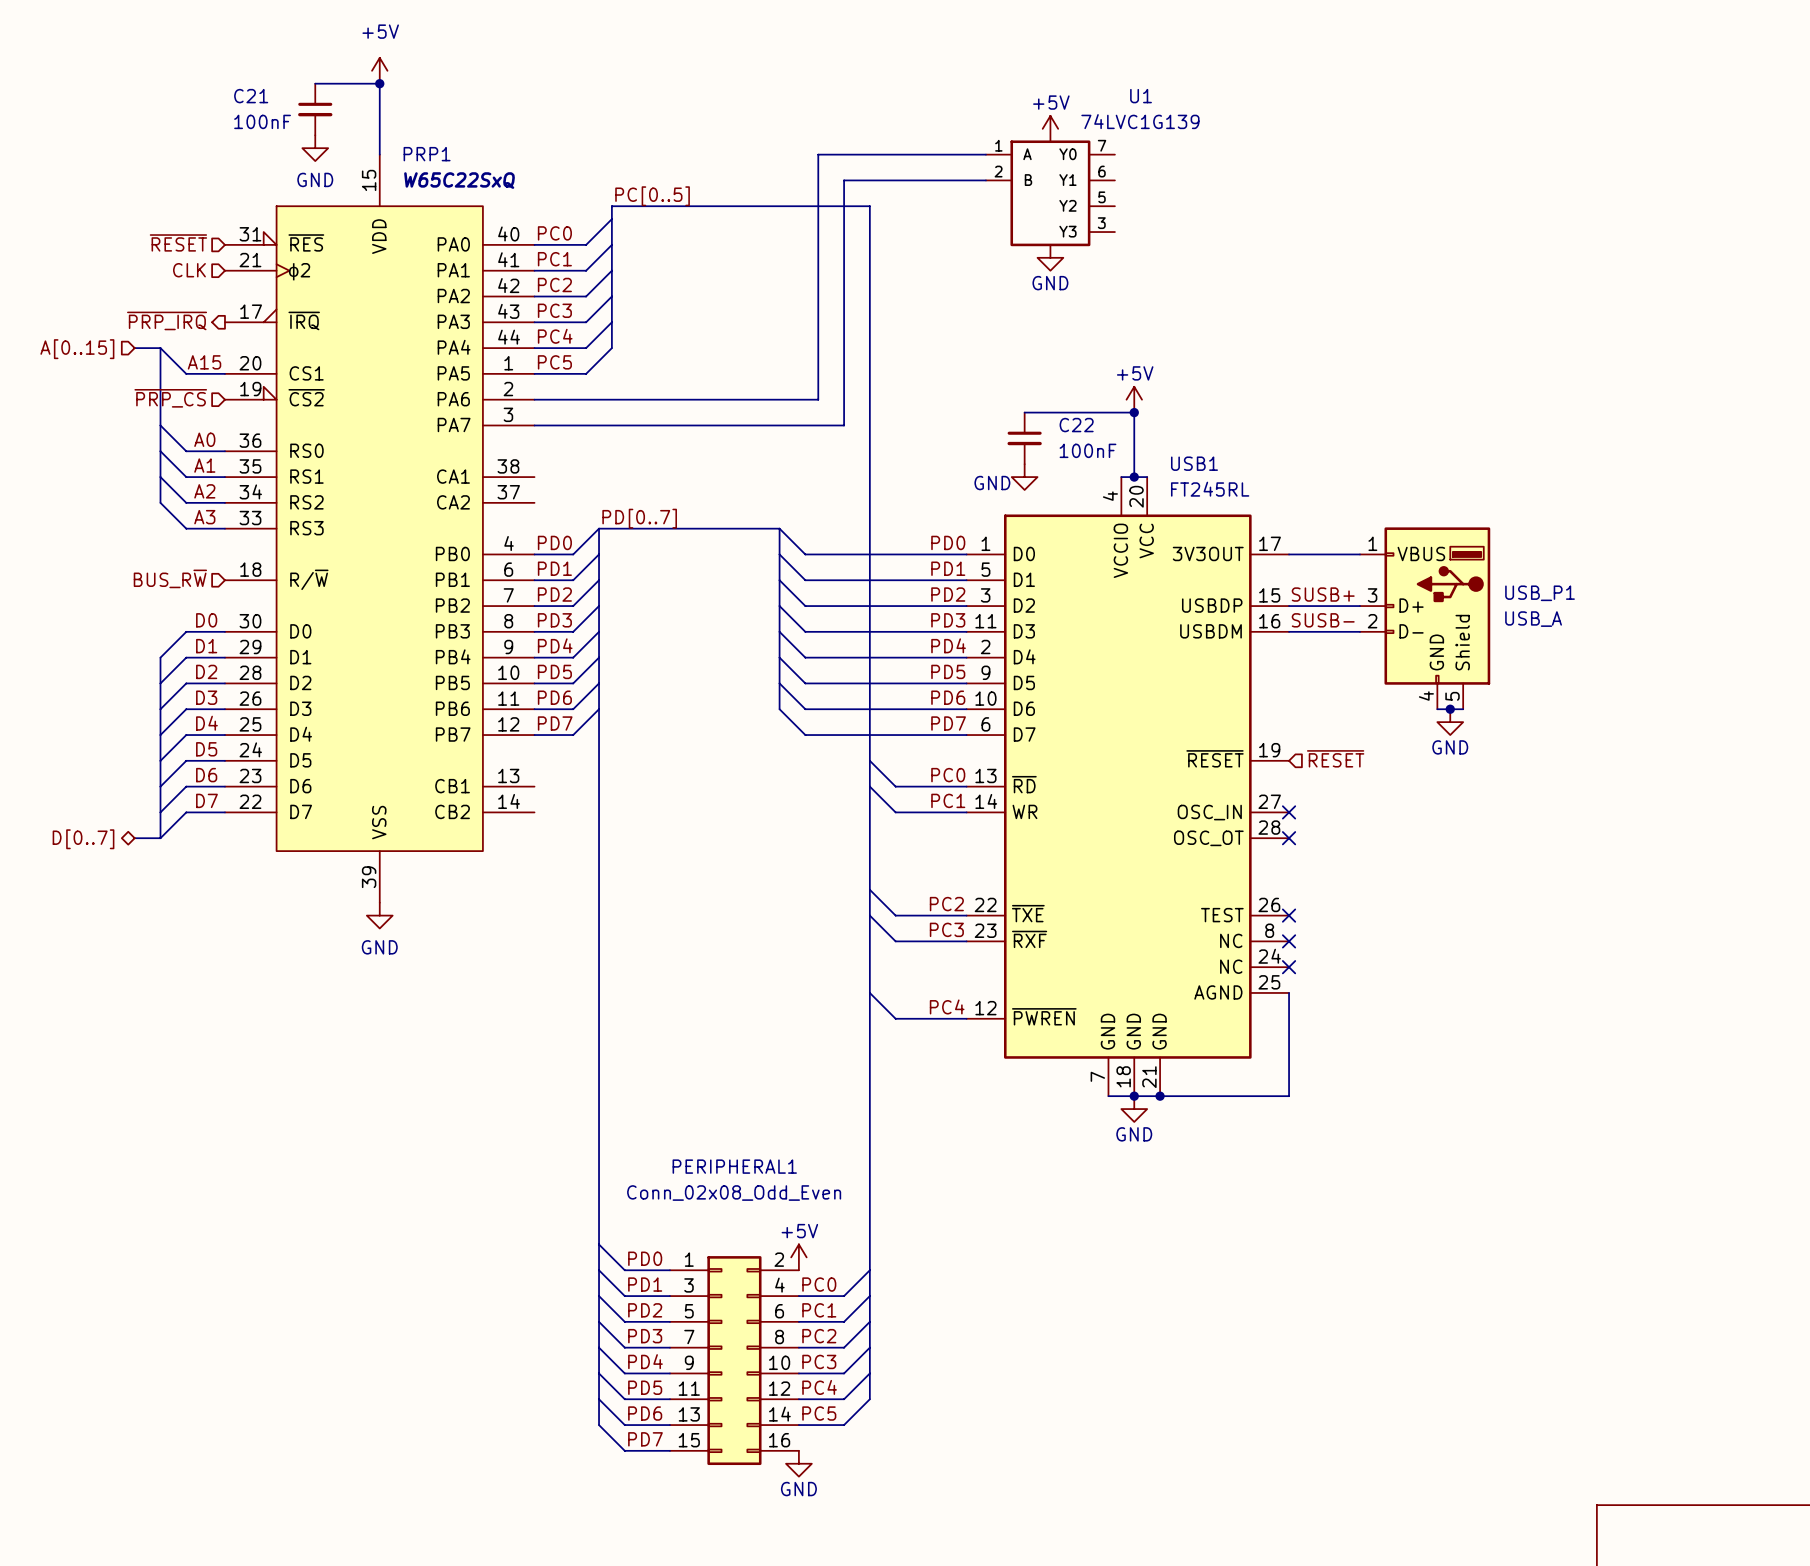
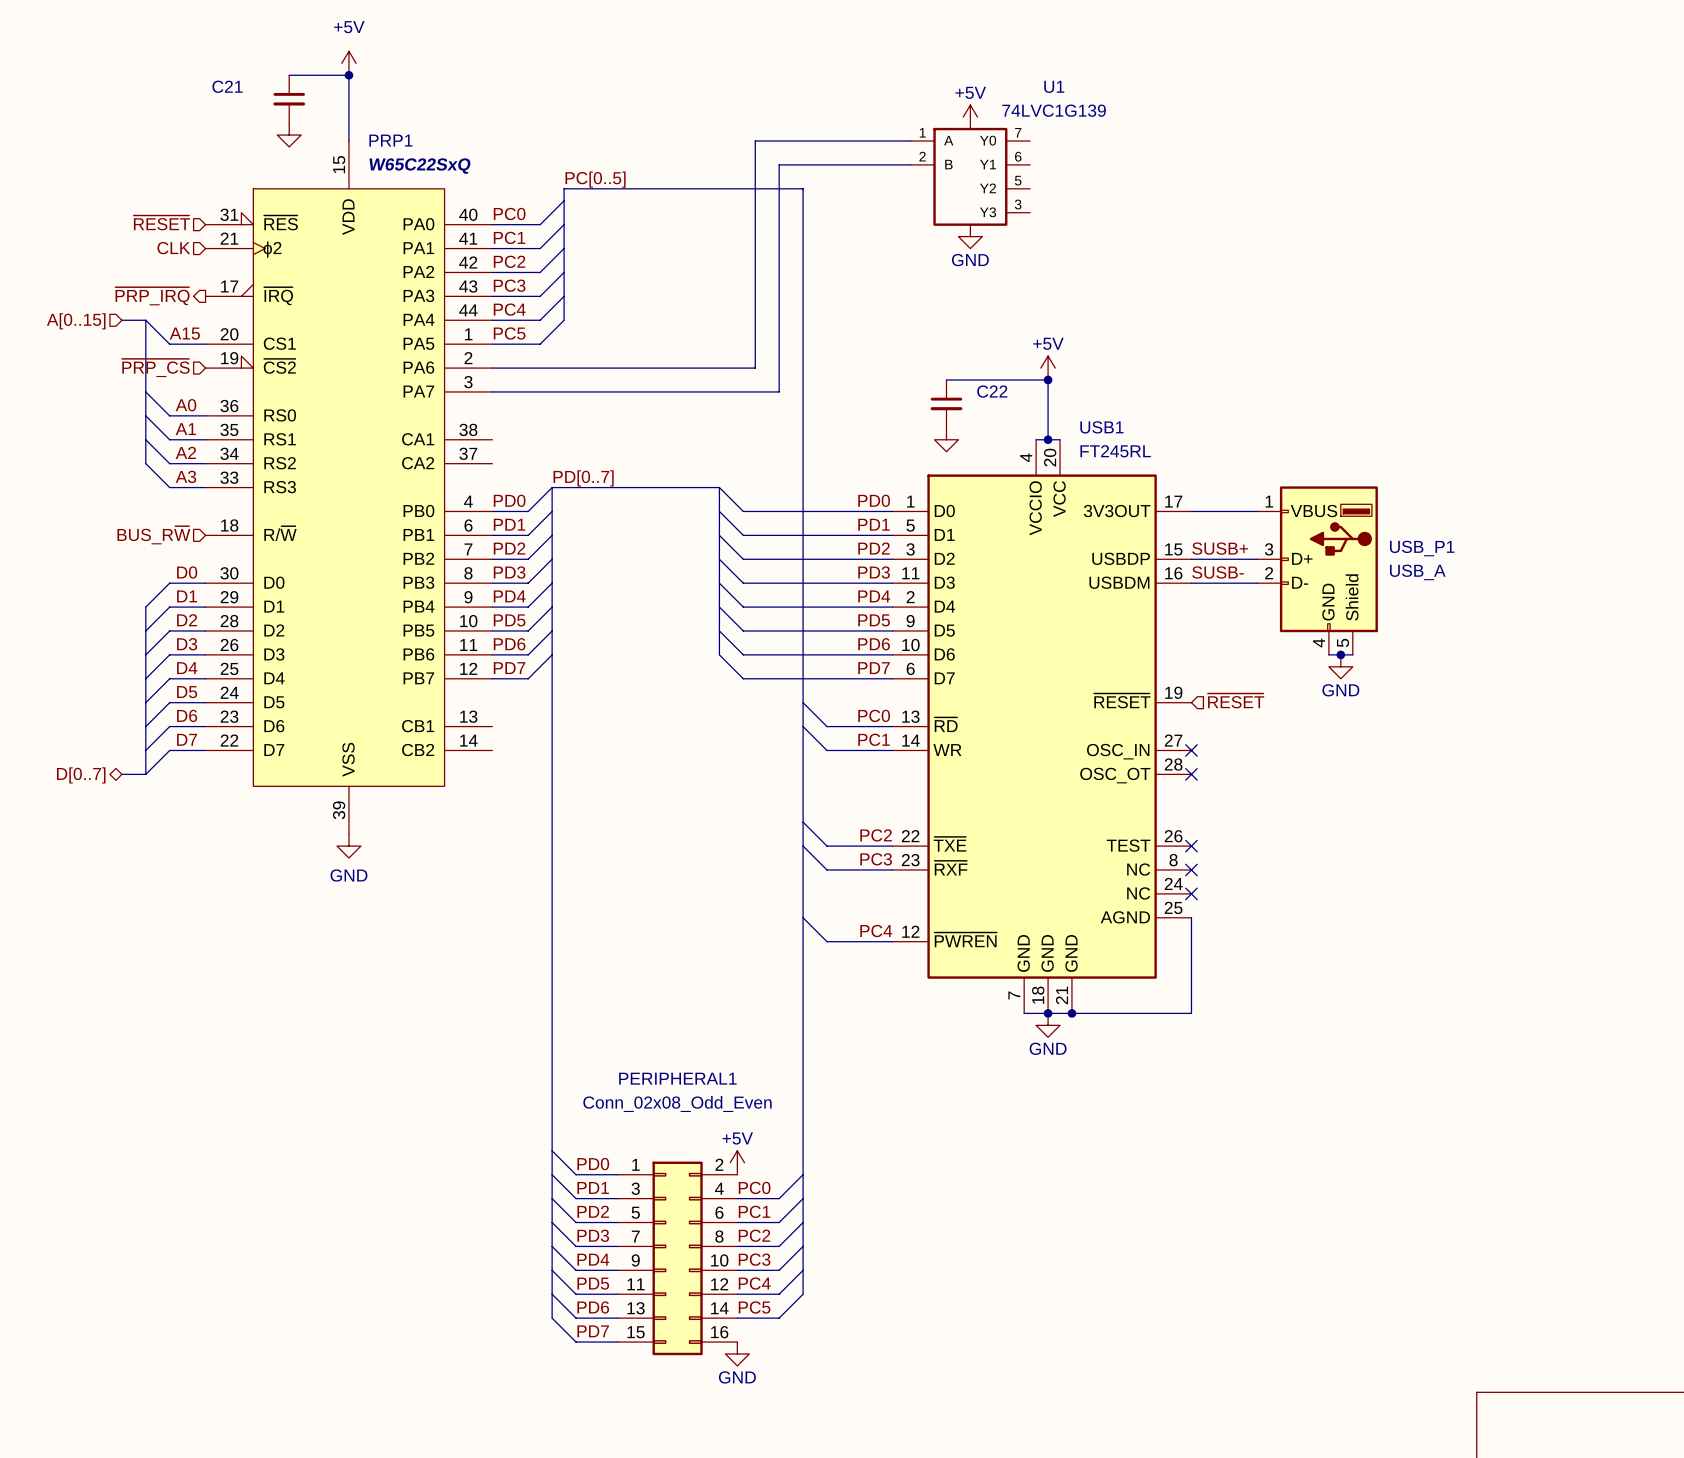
C21 value: 100nF (262, 121) -> none
power symbol text: GND (315, 179) -> none
C22 value: 100nF (1087, 450) -> none
power symbol text: GND (992, 483) -> none

